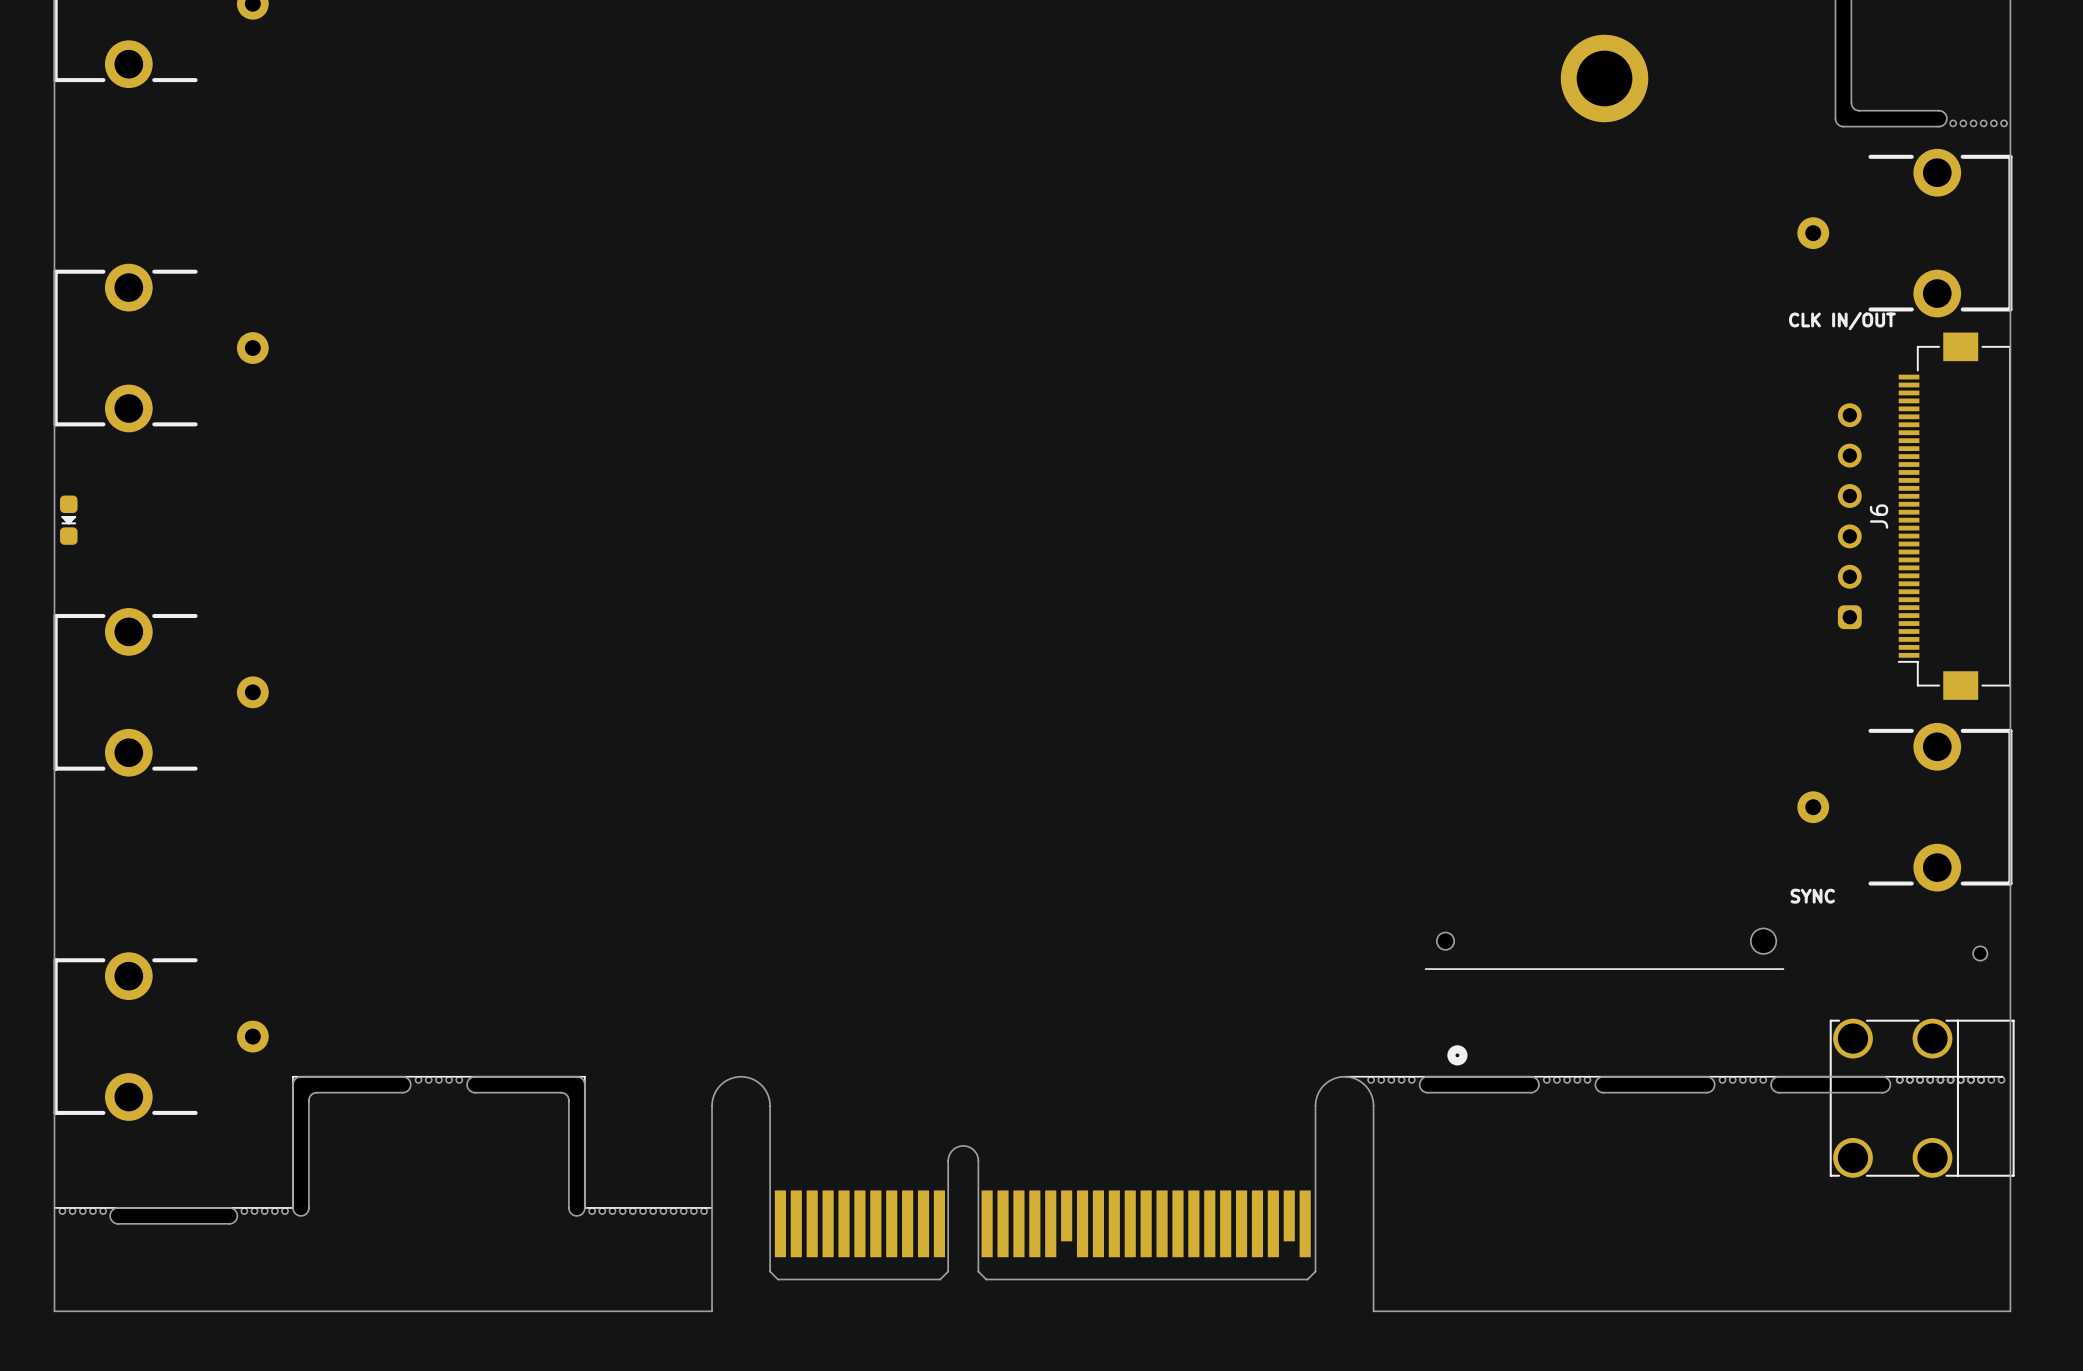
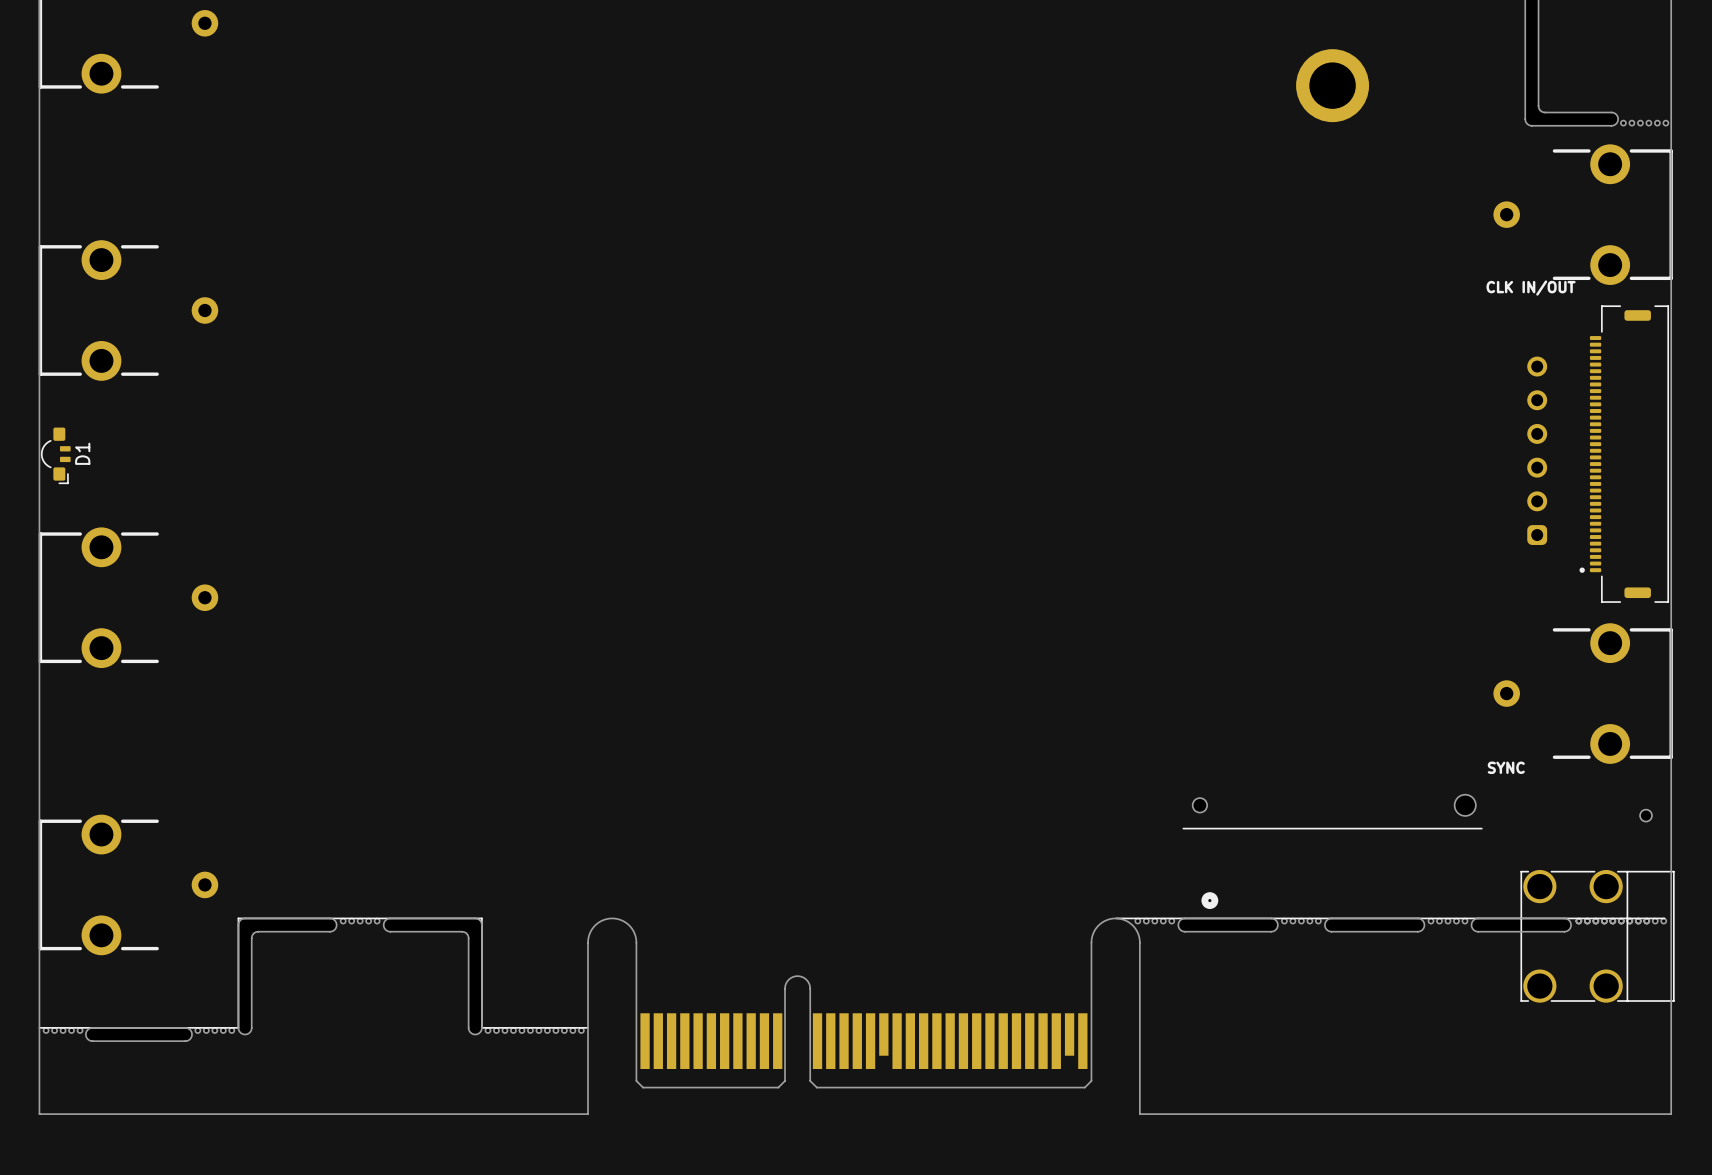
J6: (1954, 516) -> none
part: (68, 520) -> none
part: none -> (1624, 454)
D1: none -> (55, 455)

